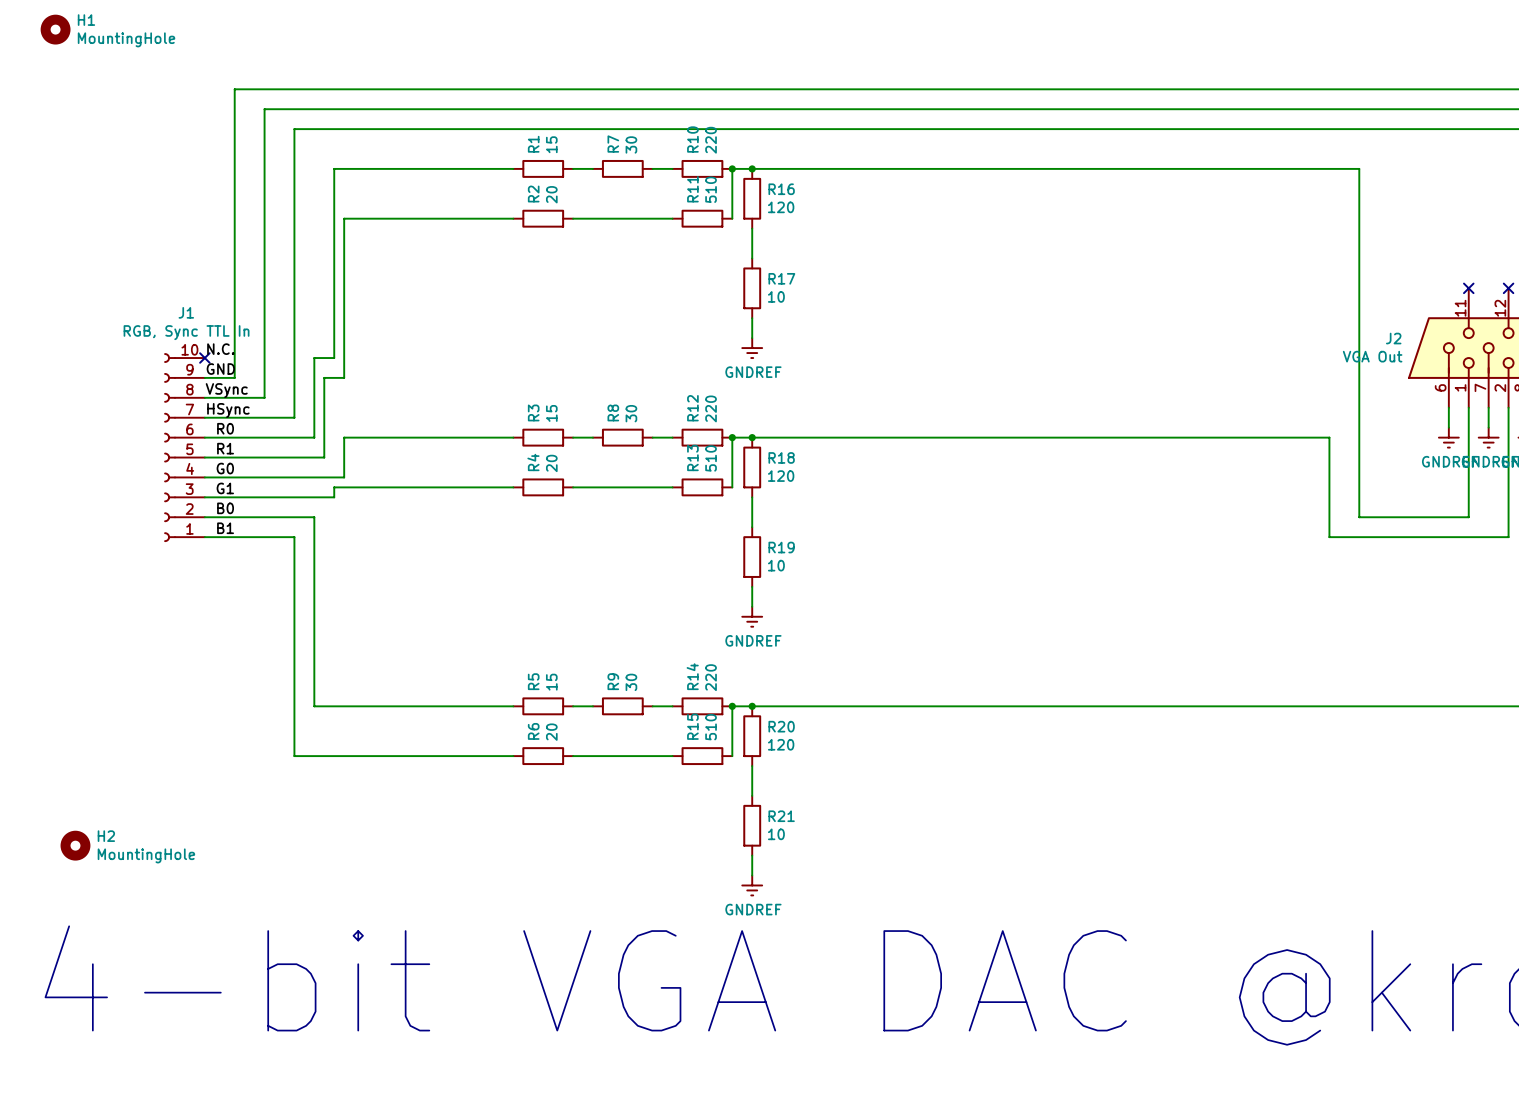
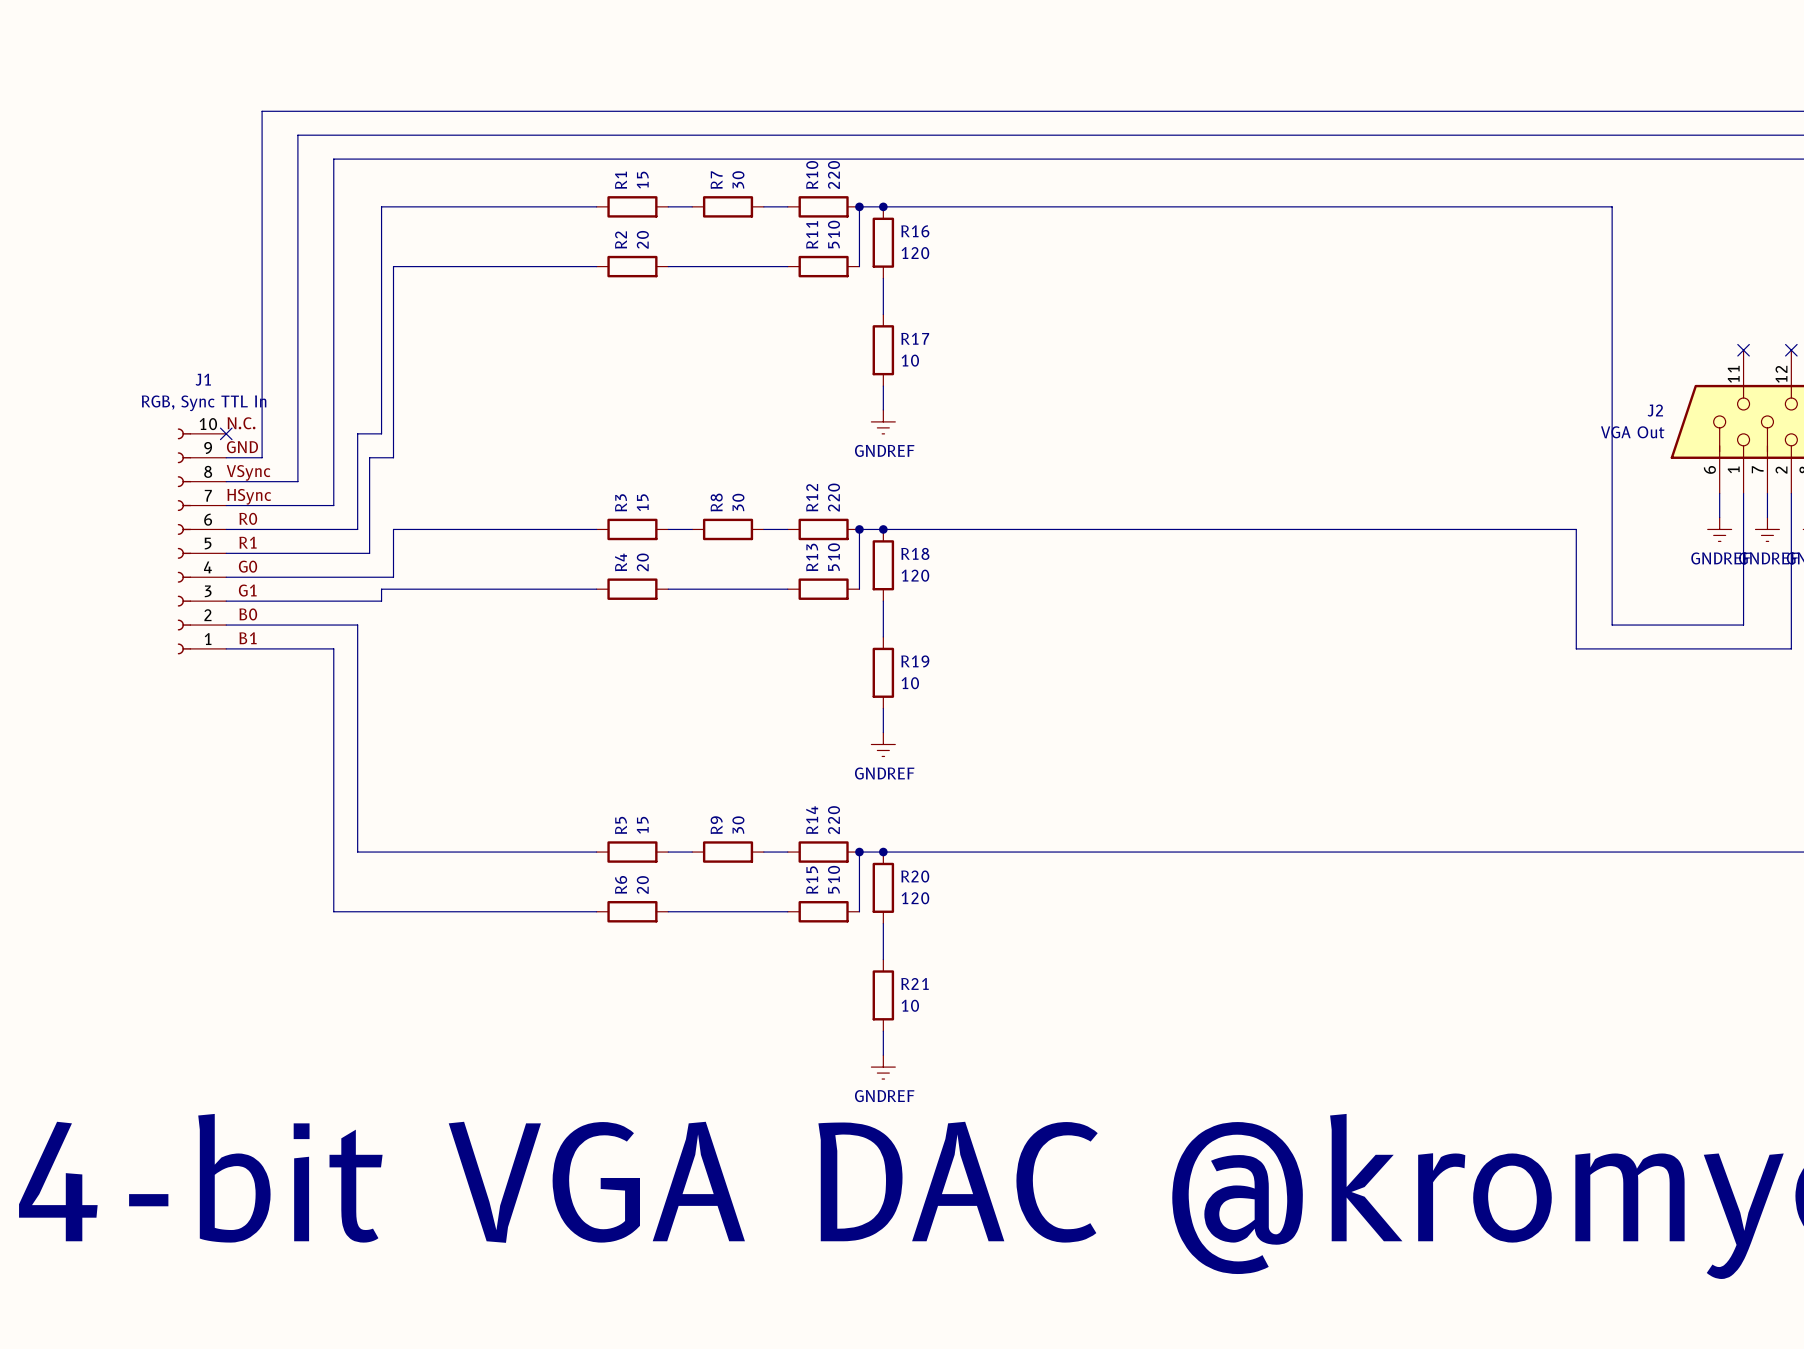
H1: MountingHole (55, 29) -> none
H2: MountingHole (75, 845) -> none

